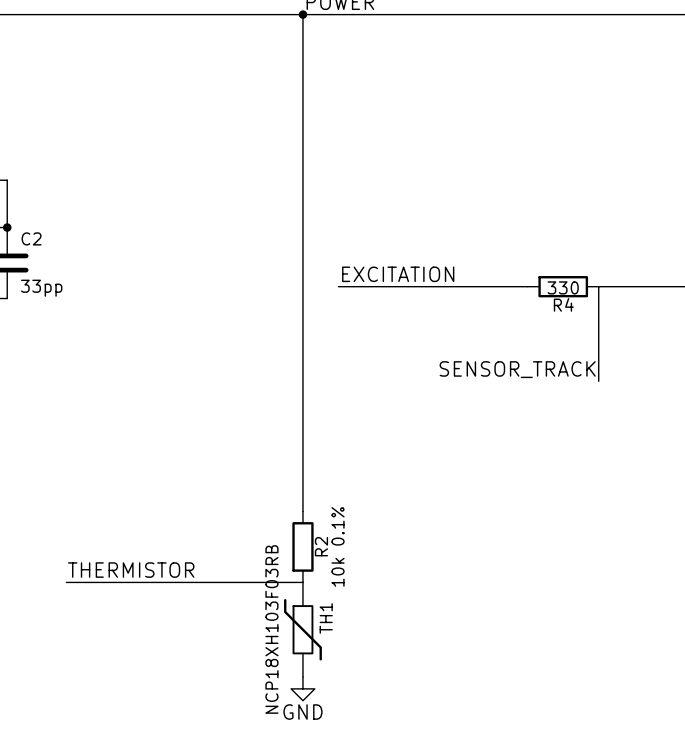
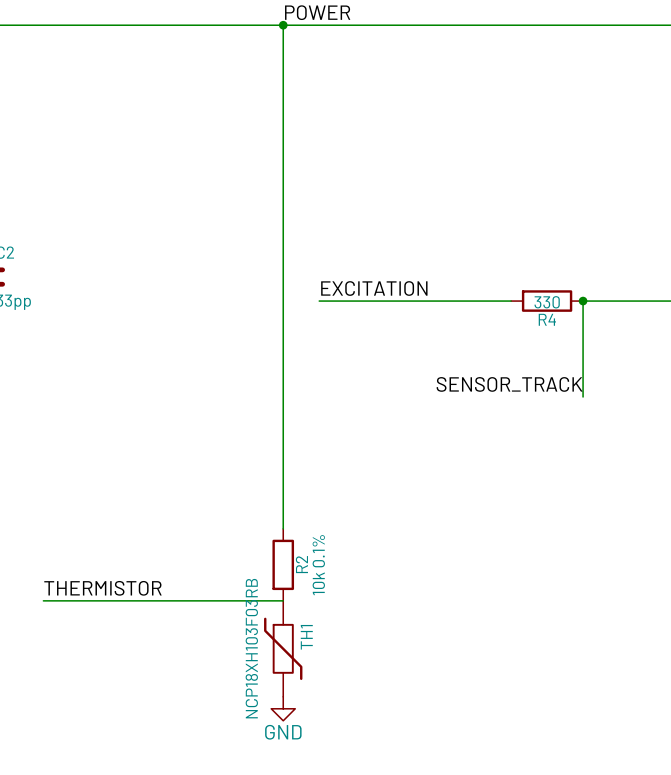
junction: none -> (583, 301)

